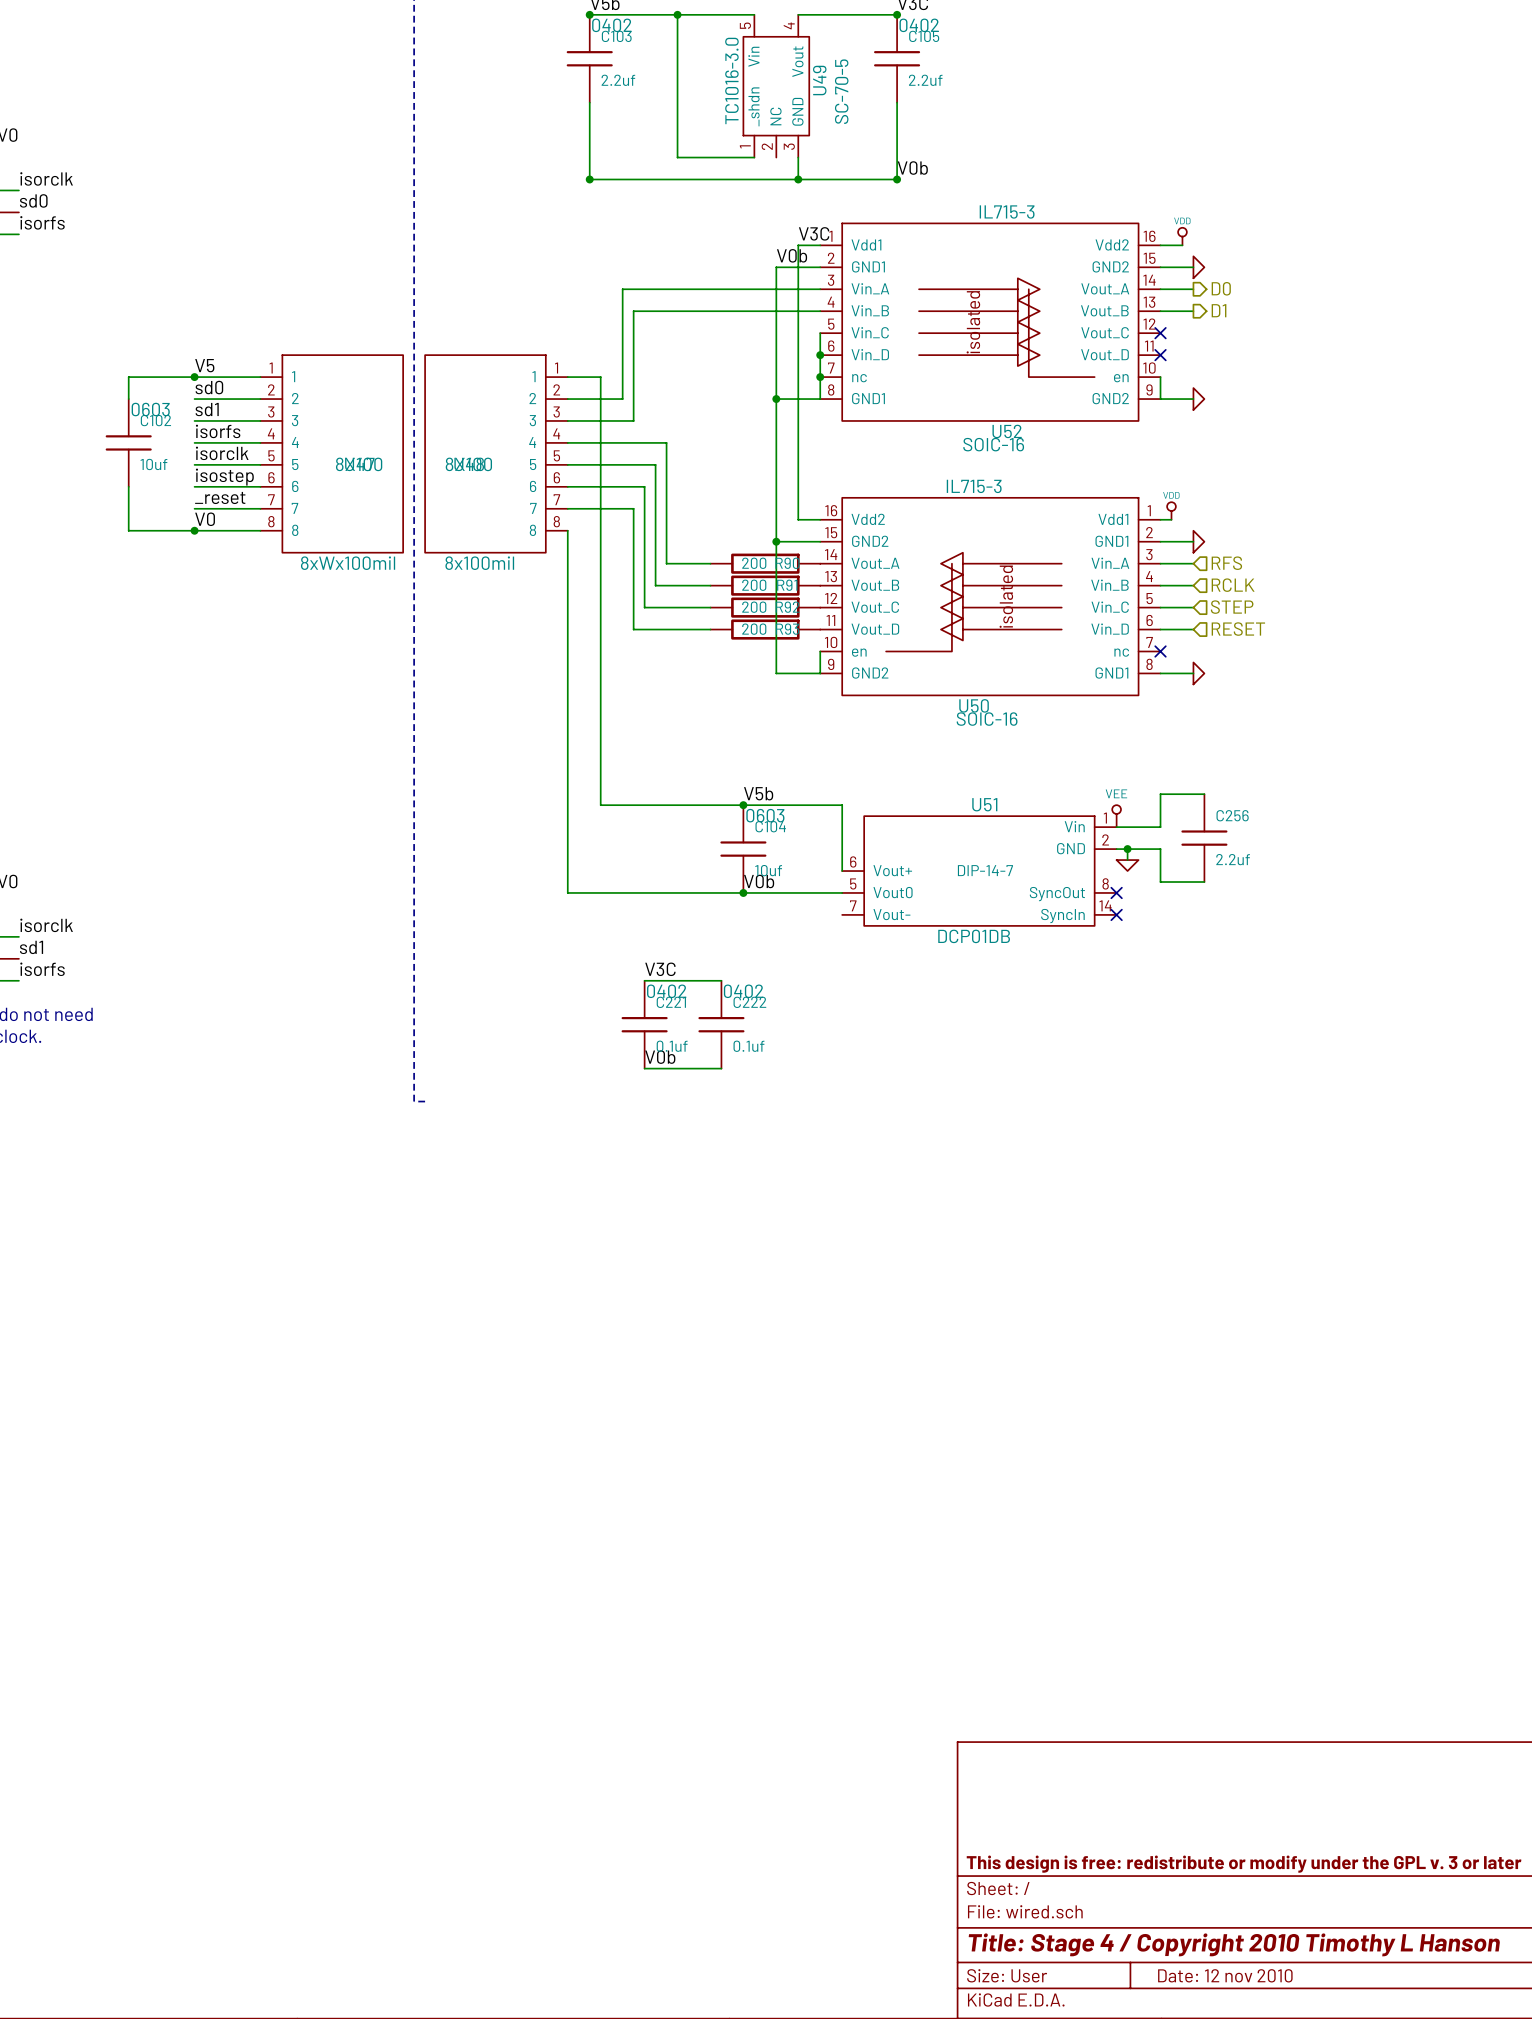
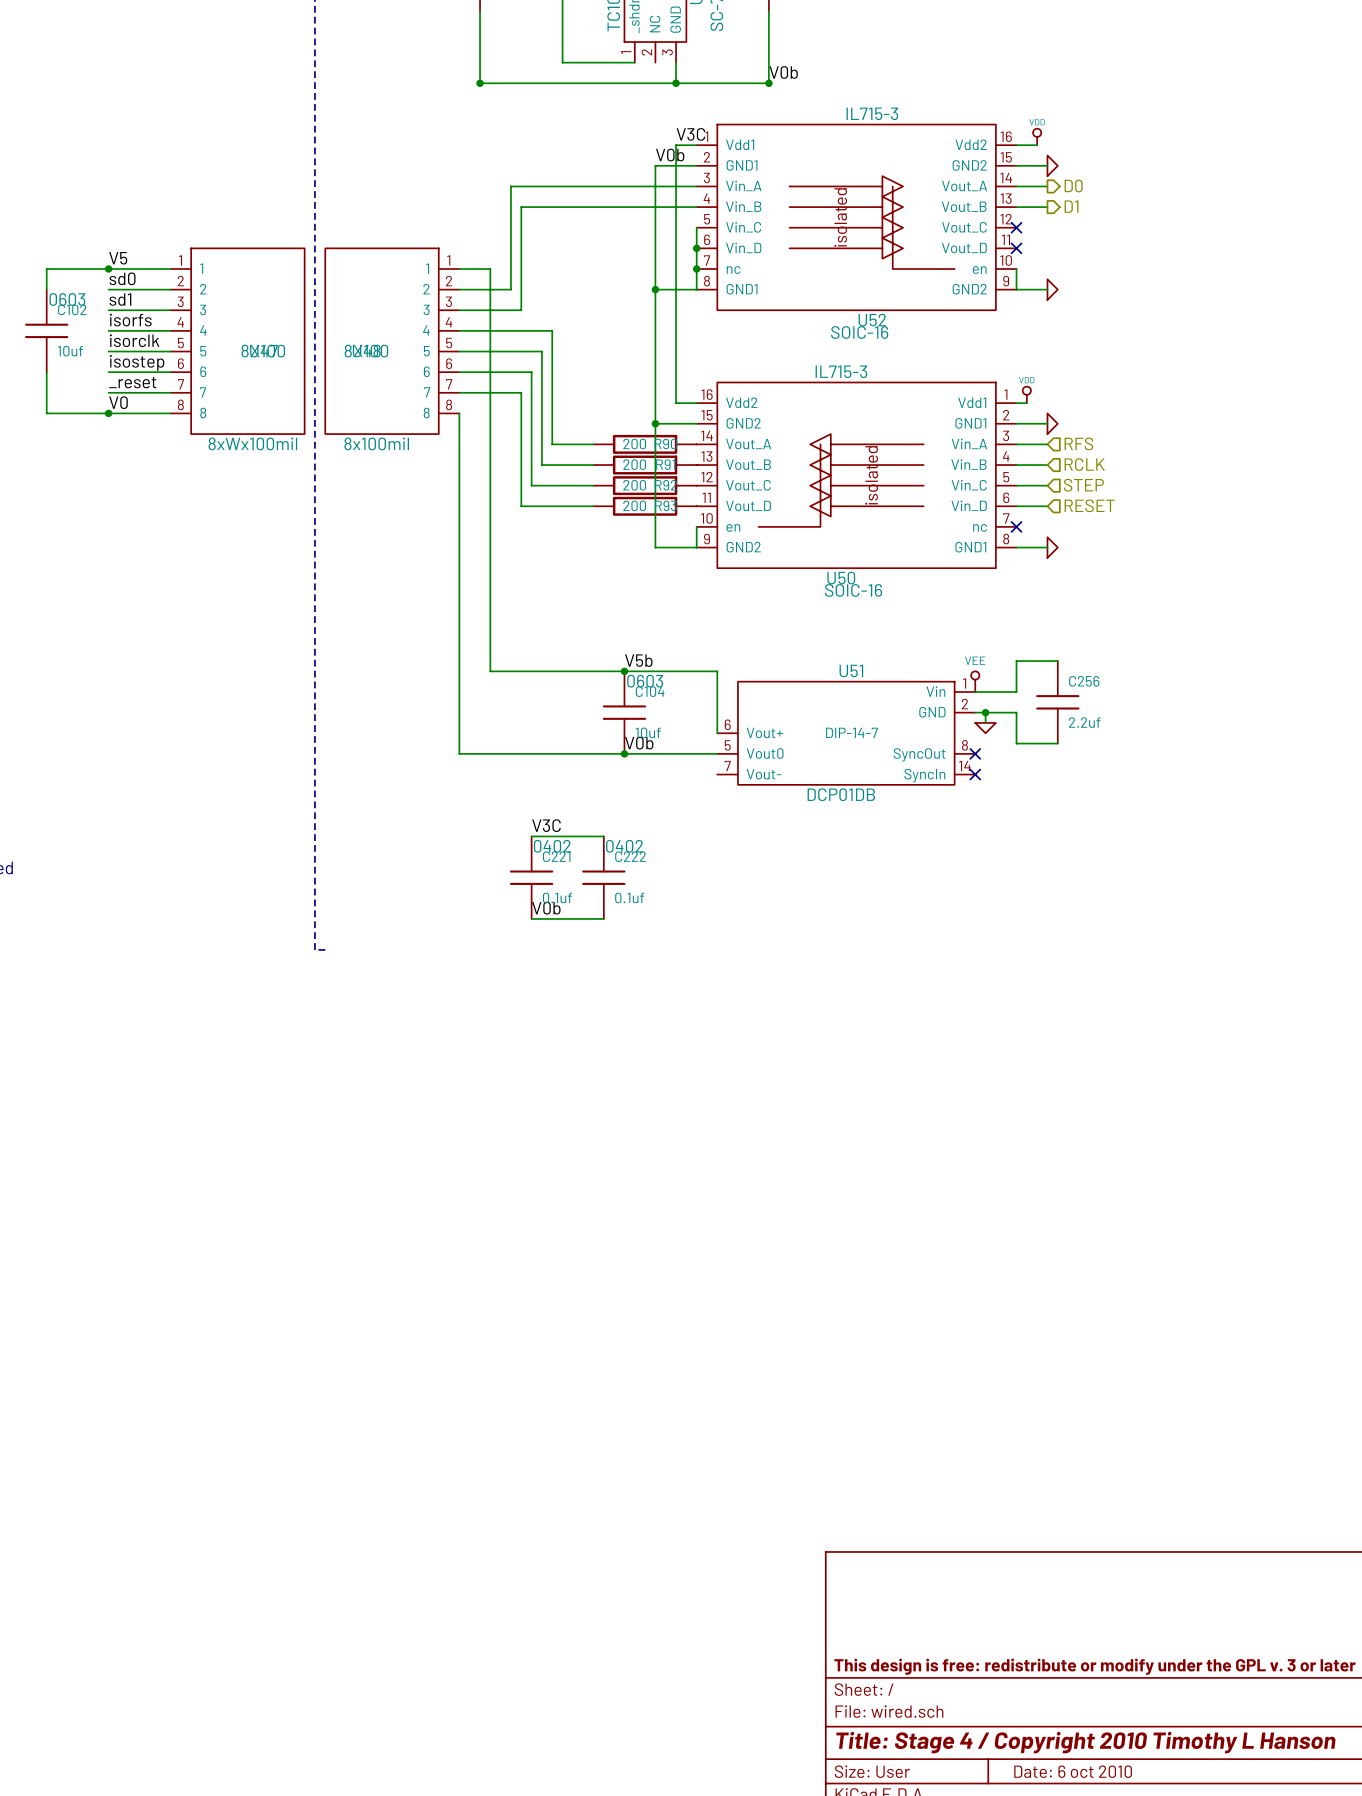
title block: Date: 12 nov 2010 (1225, 1975) -> Date: 6 oct 2010 (1073, 1771)

